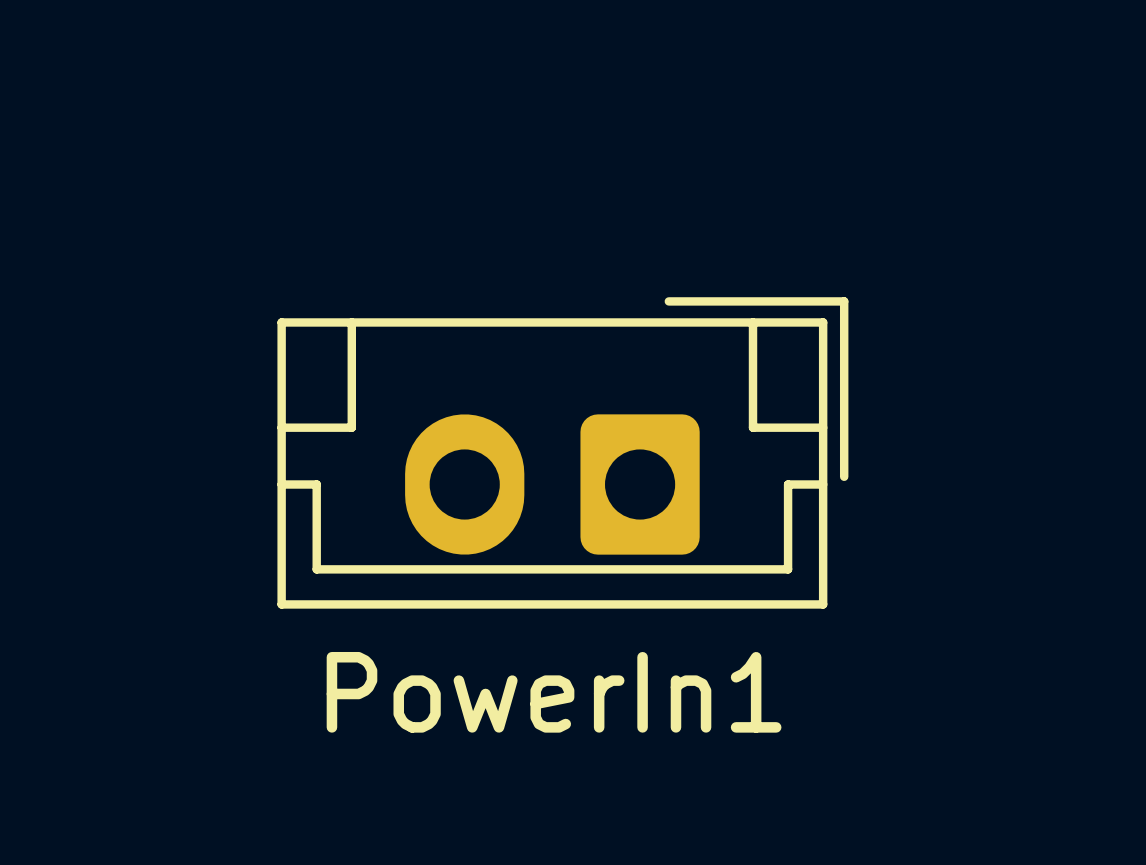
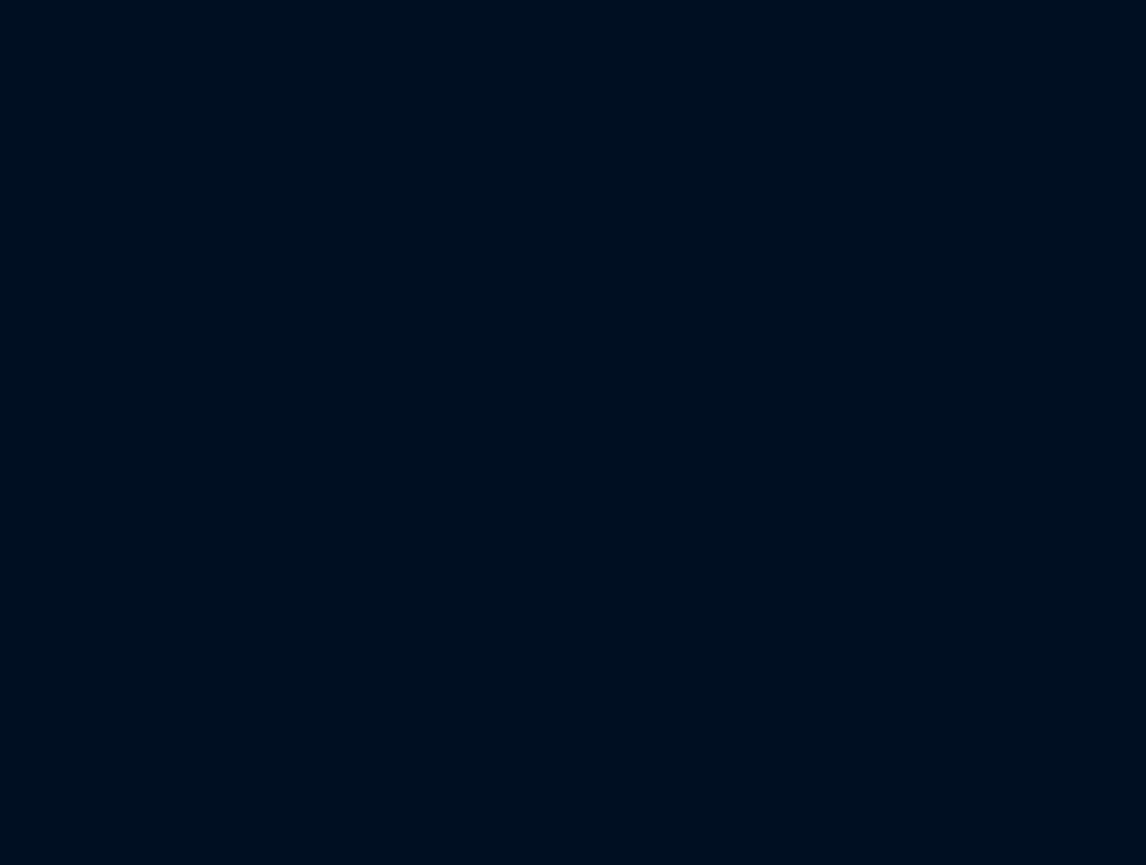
PowerIn1: (562, 452) -> none

